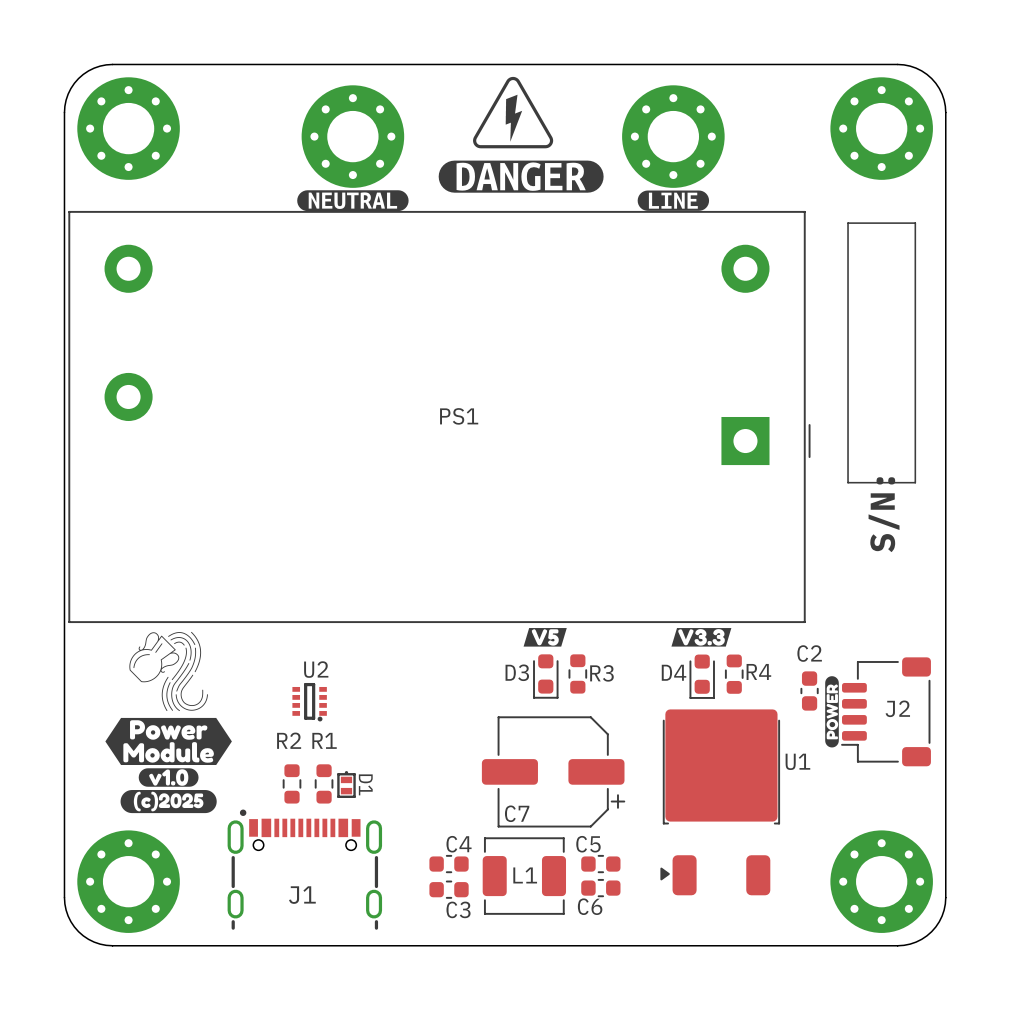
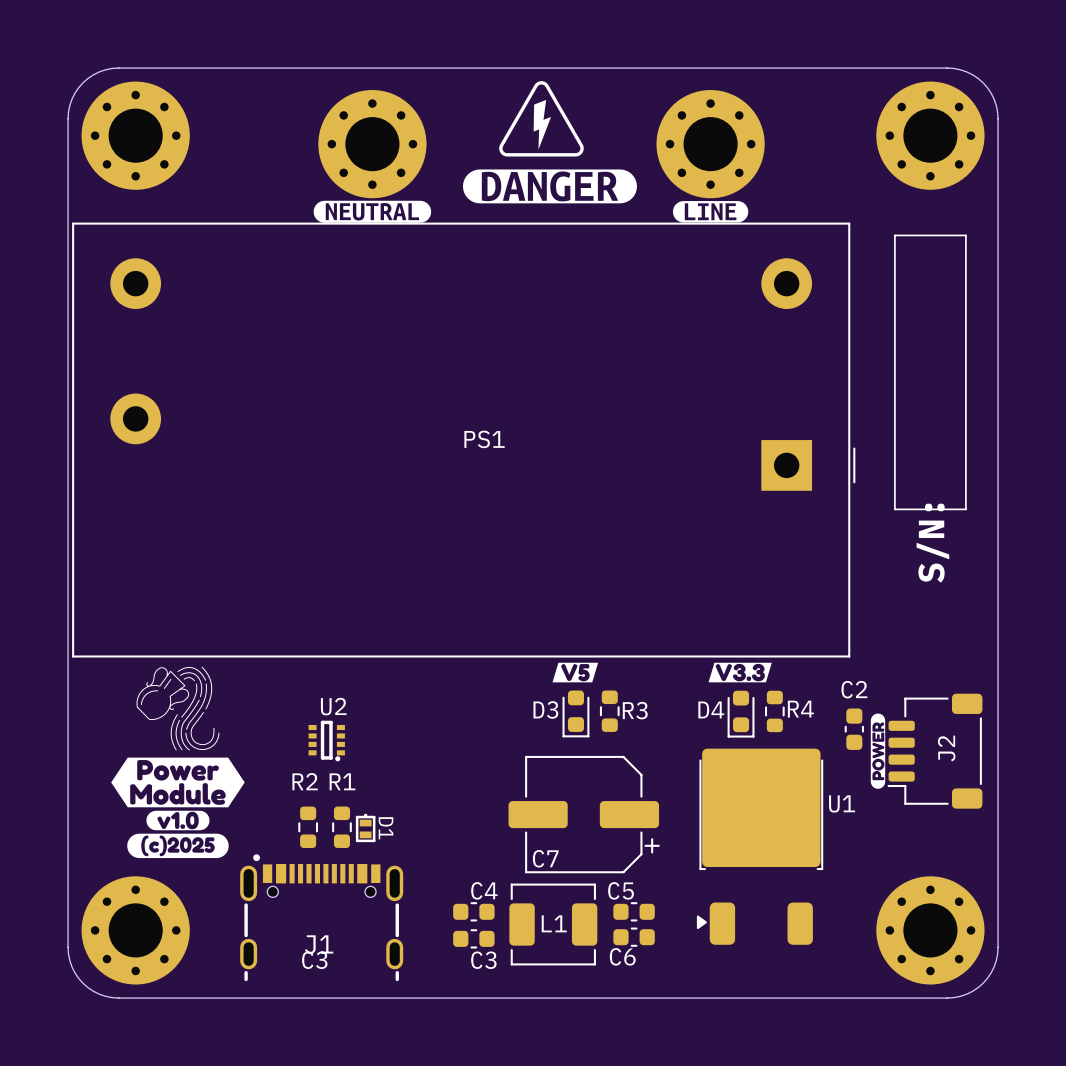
J2 name rotation: 0° (897, 708) -> 90° counterclockwise (946, 748)
text: none -> C3 (314, 960)

